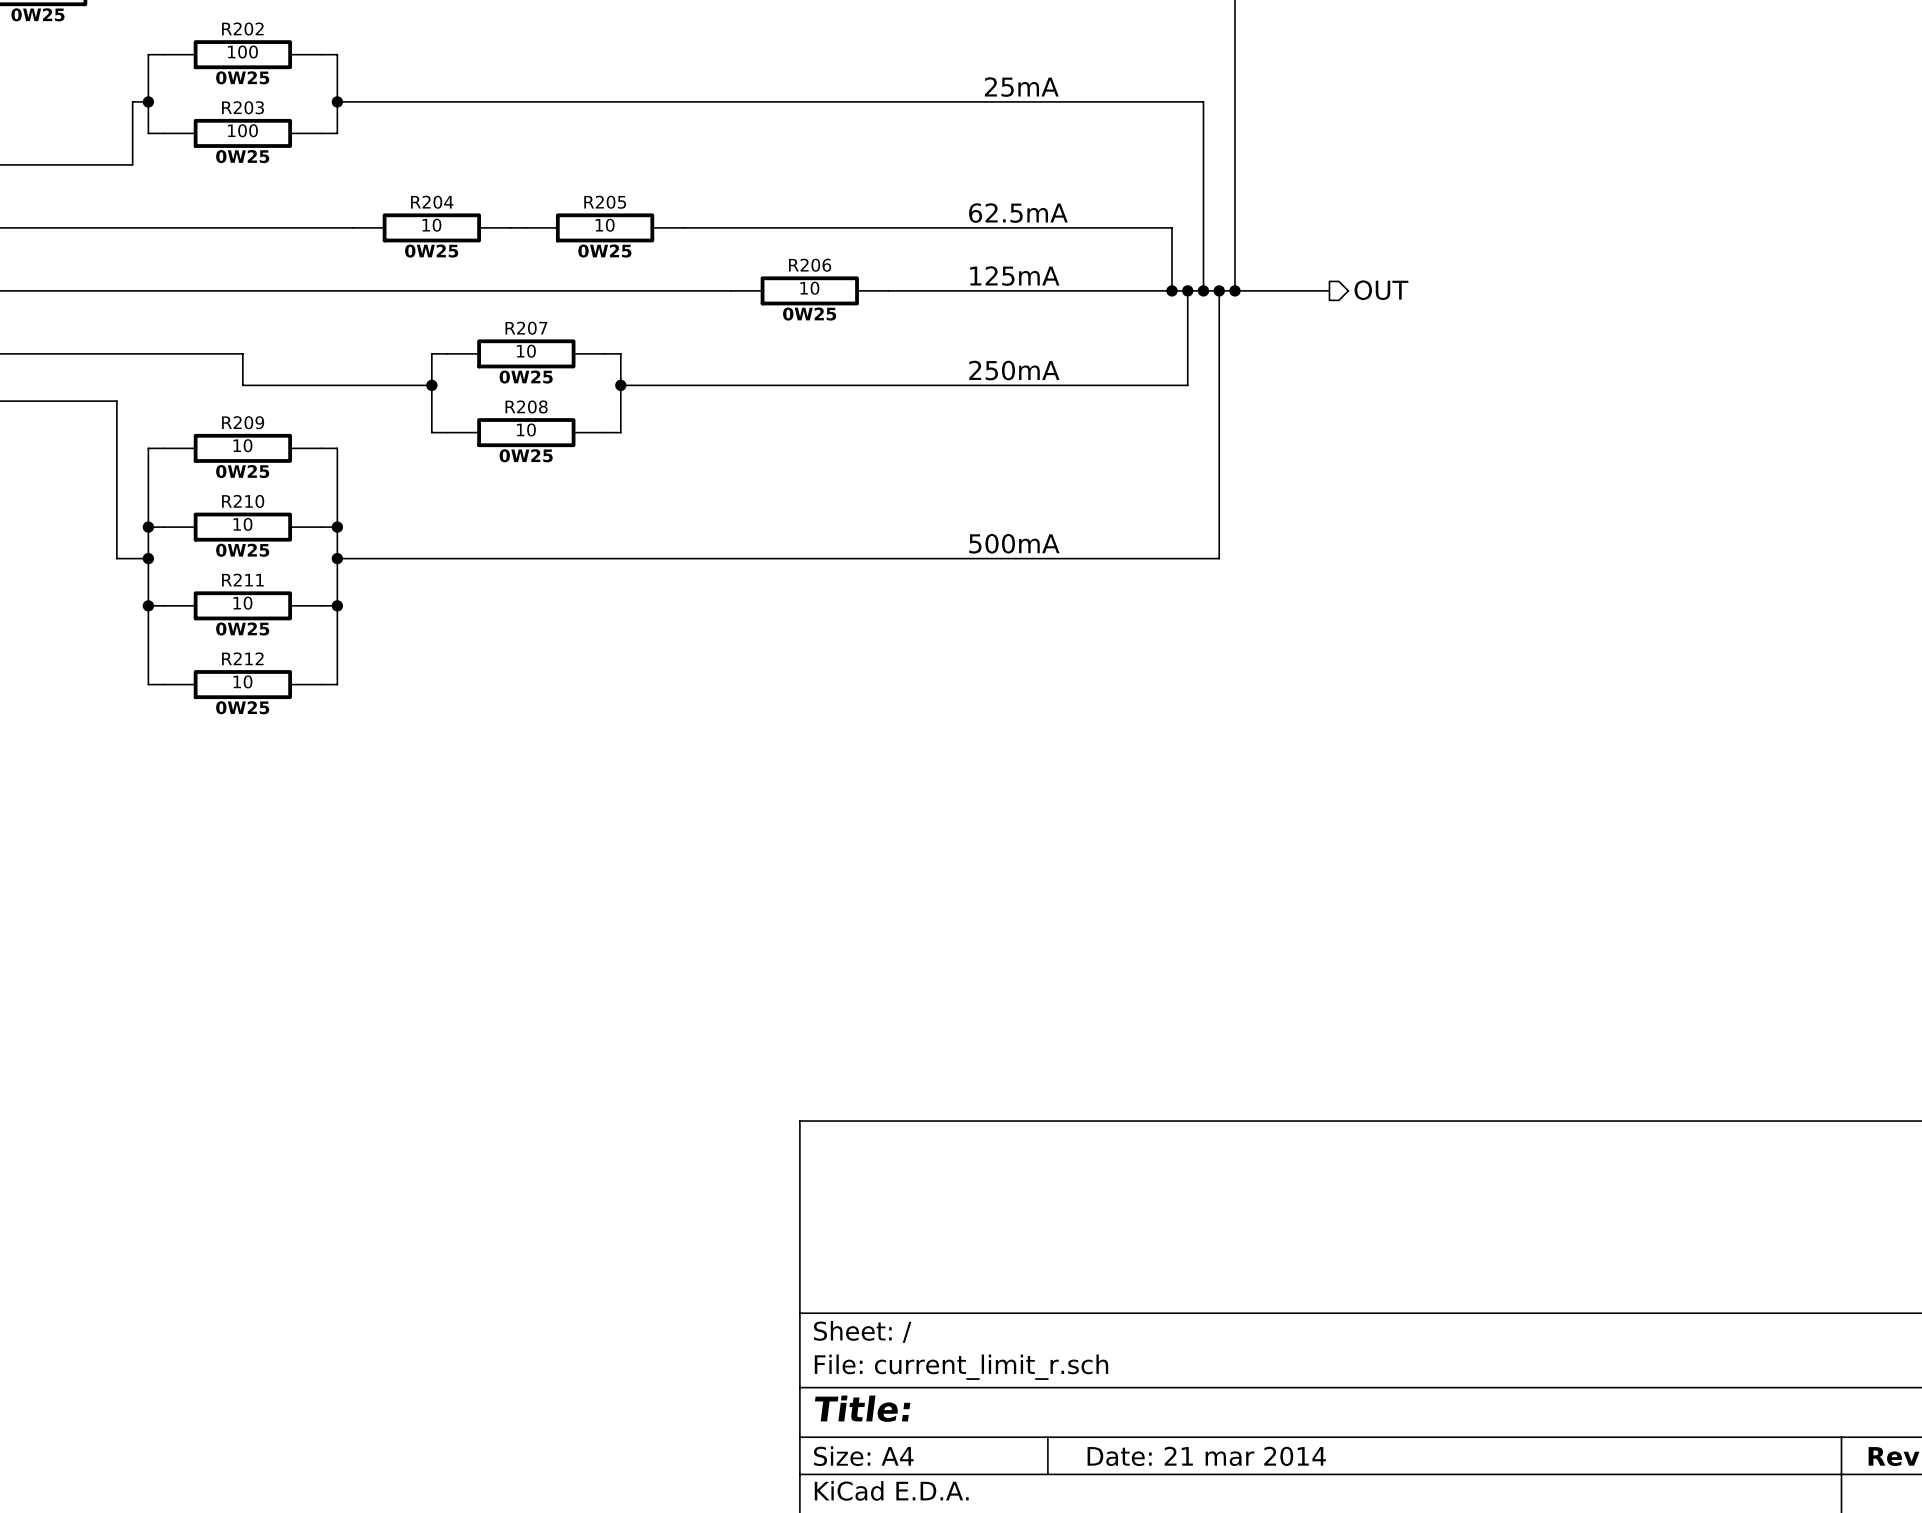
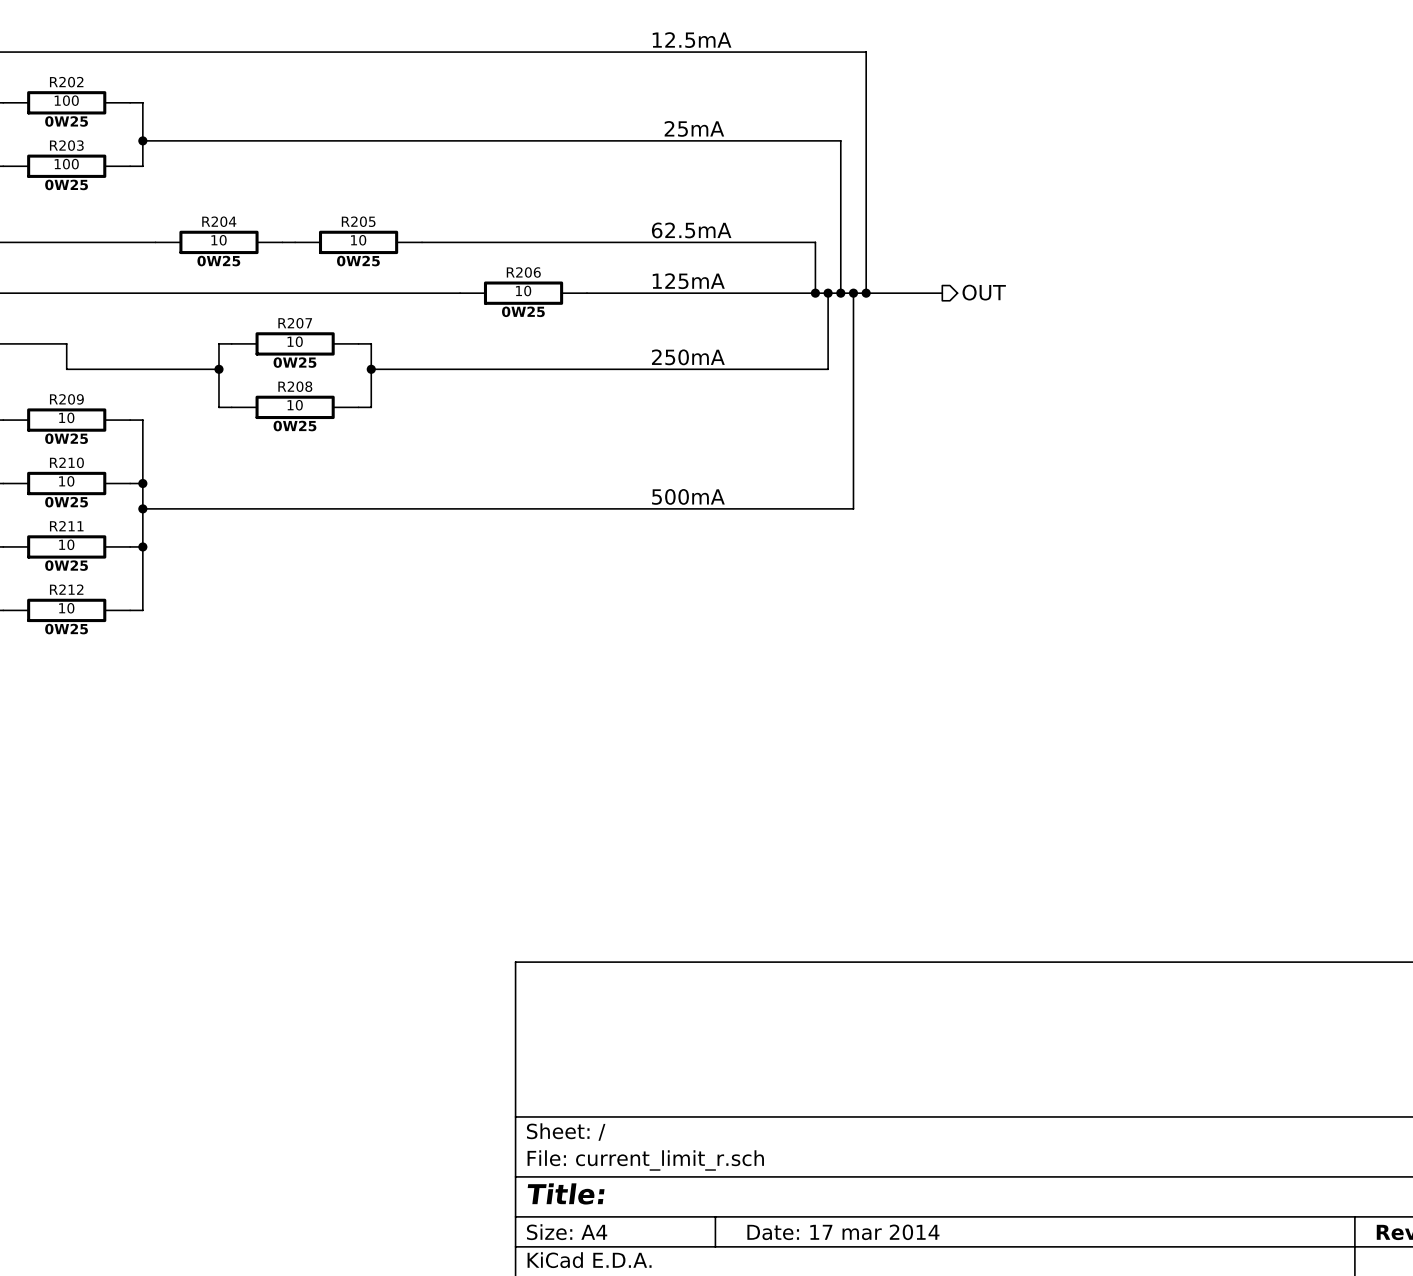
title block: Date: 21 mar 2014 (1206, 1456) -> Date: 17 mar 2014 (843, 1232)

